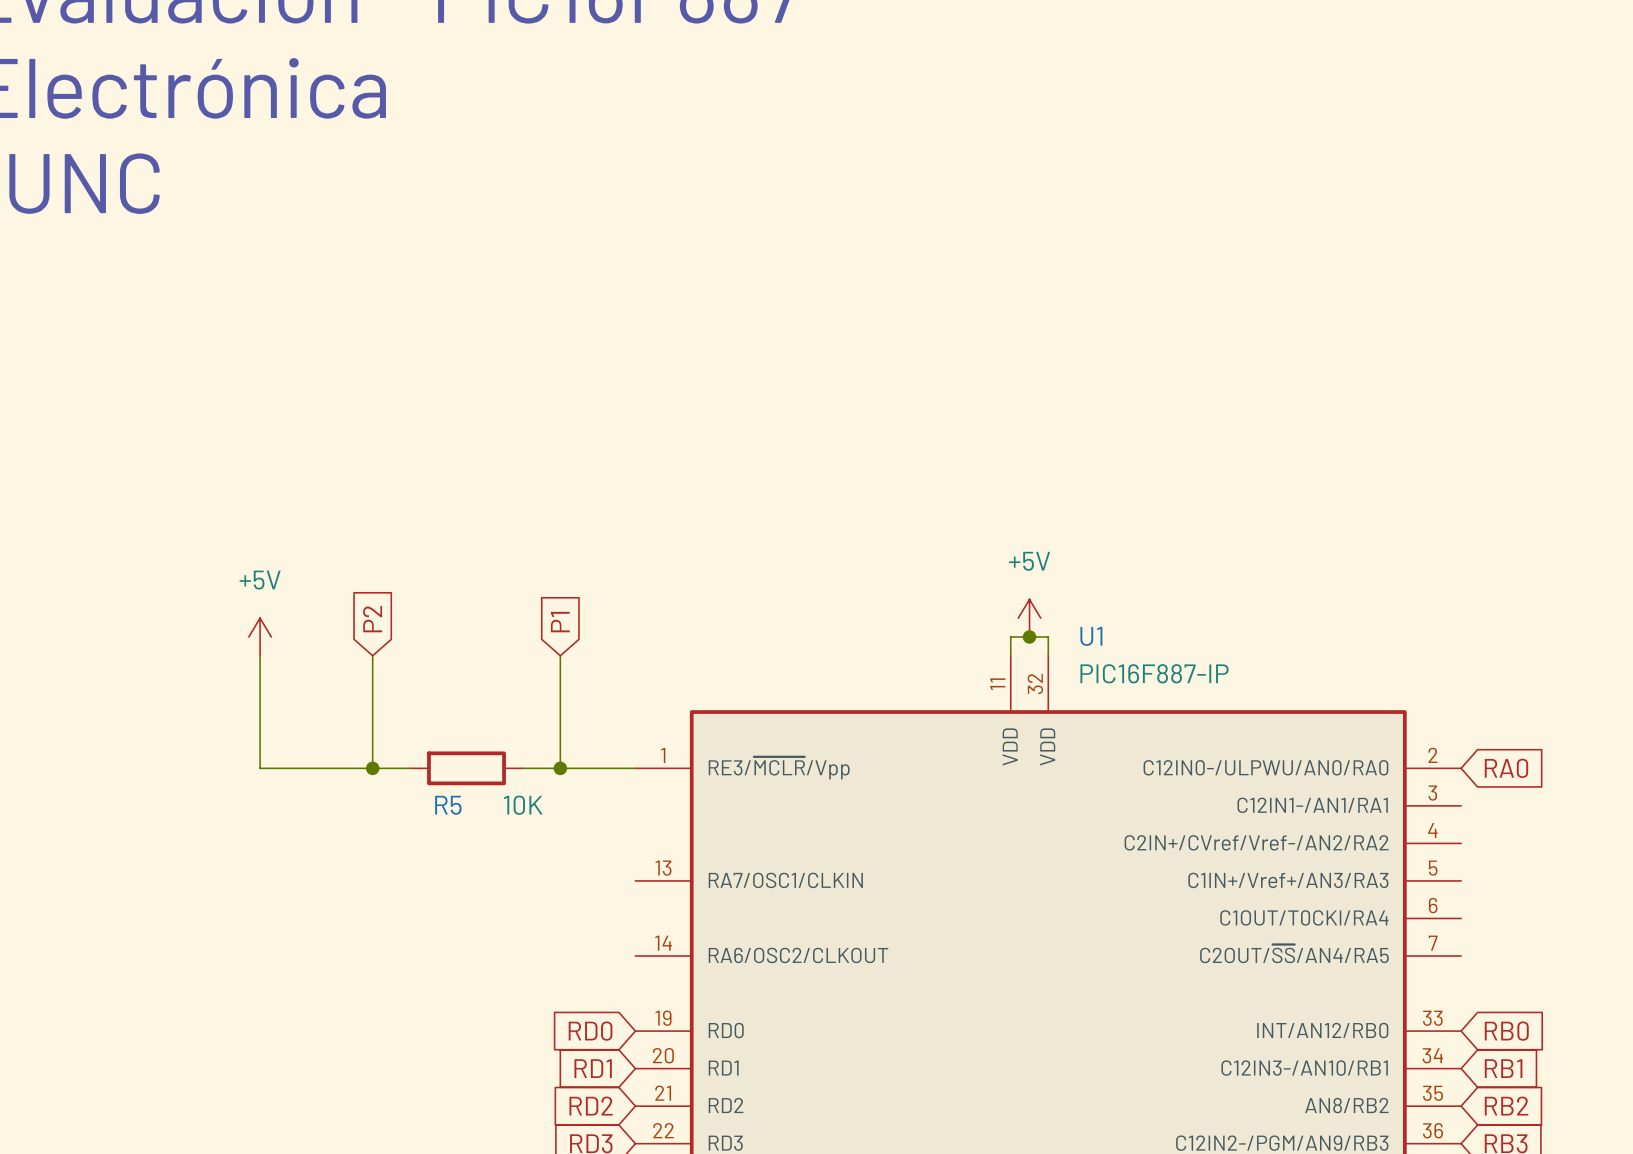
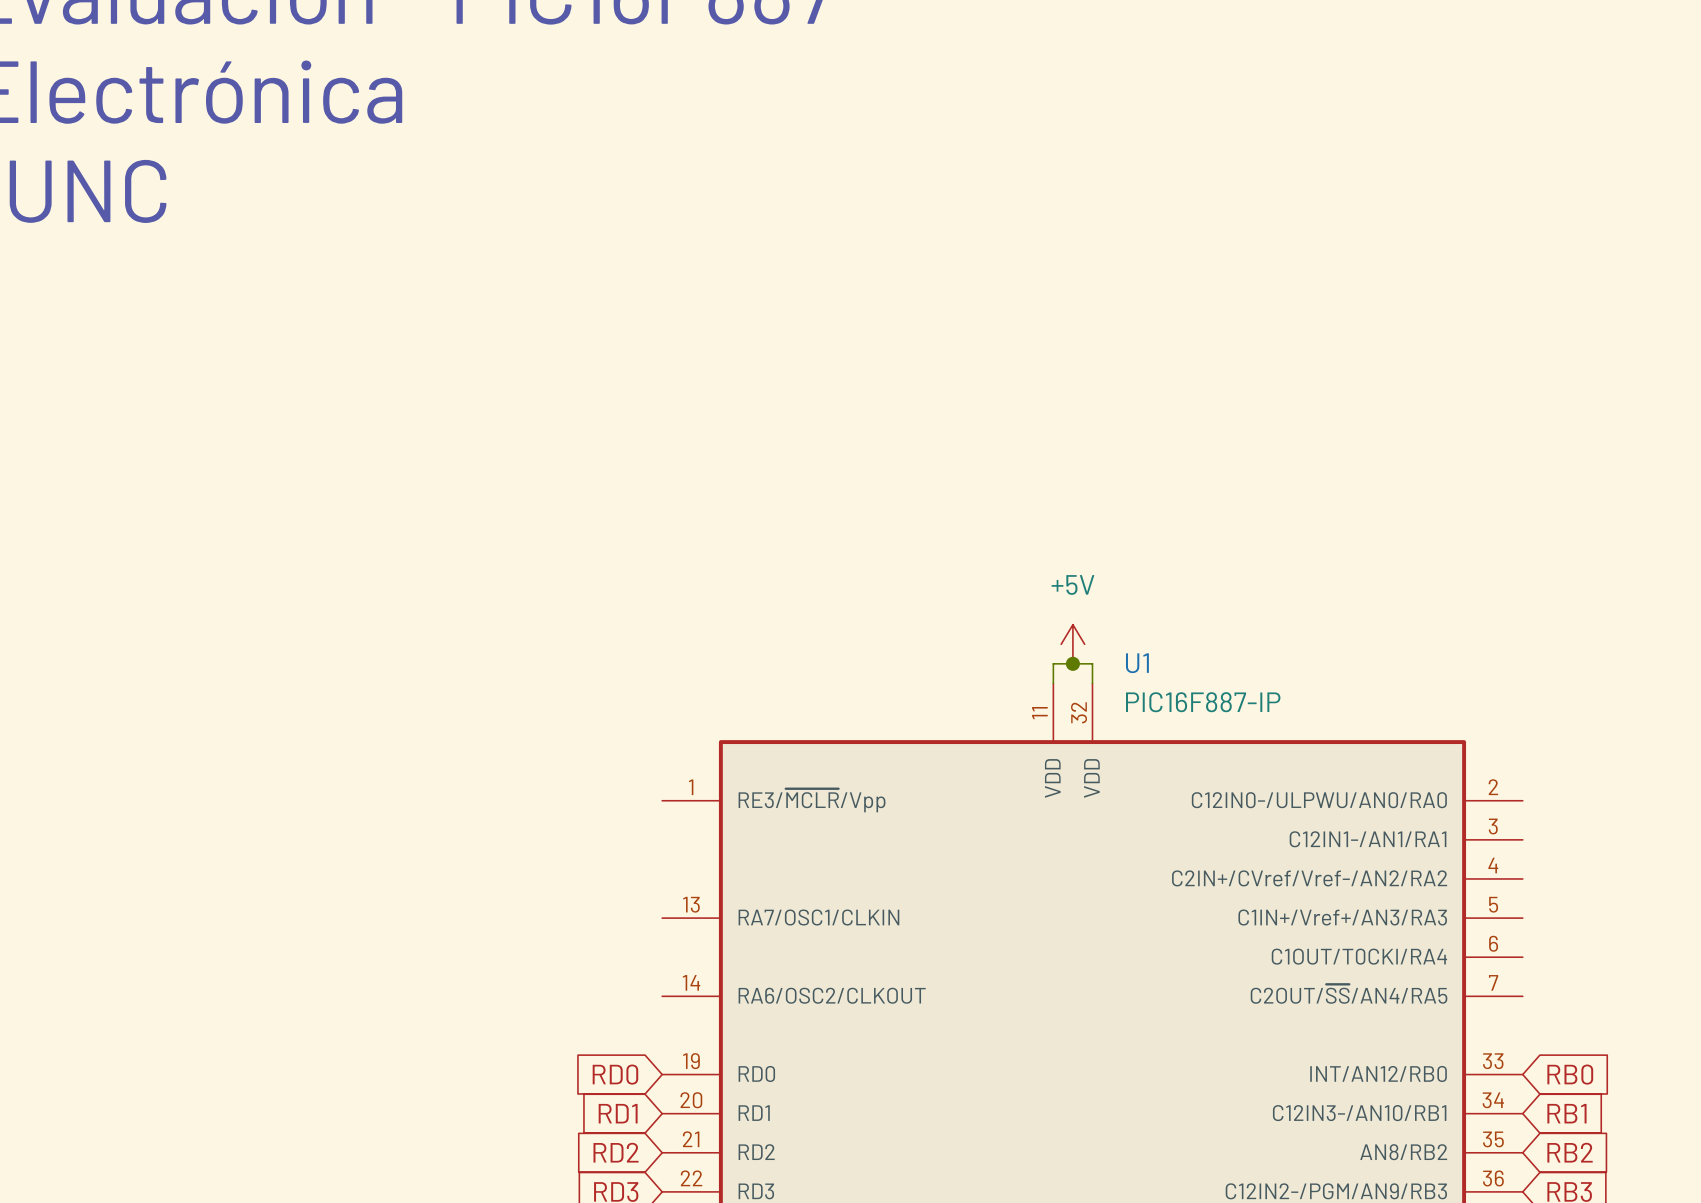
global label: P2 (372, 619) -> none
global label: P1 (560, 622) -> none
power symbol: +5V (260, 636) -> none
wire: (260, 655) (260, 768) (410, 768) -> none
wire: (372, 655) (372, 768) -> none
wire: (560, 655) (560, 768) -> none
junction: (372, 768) -> none
R5: 10K (466, 768) -> none
wire: (522, 768) (635, 768) -> none
junction: (560, 768) -> none
global label: RA0 (1506, 768) -> none

